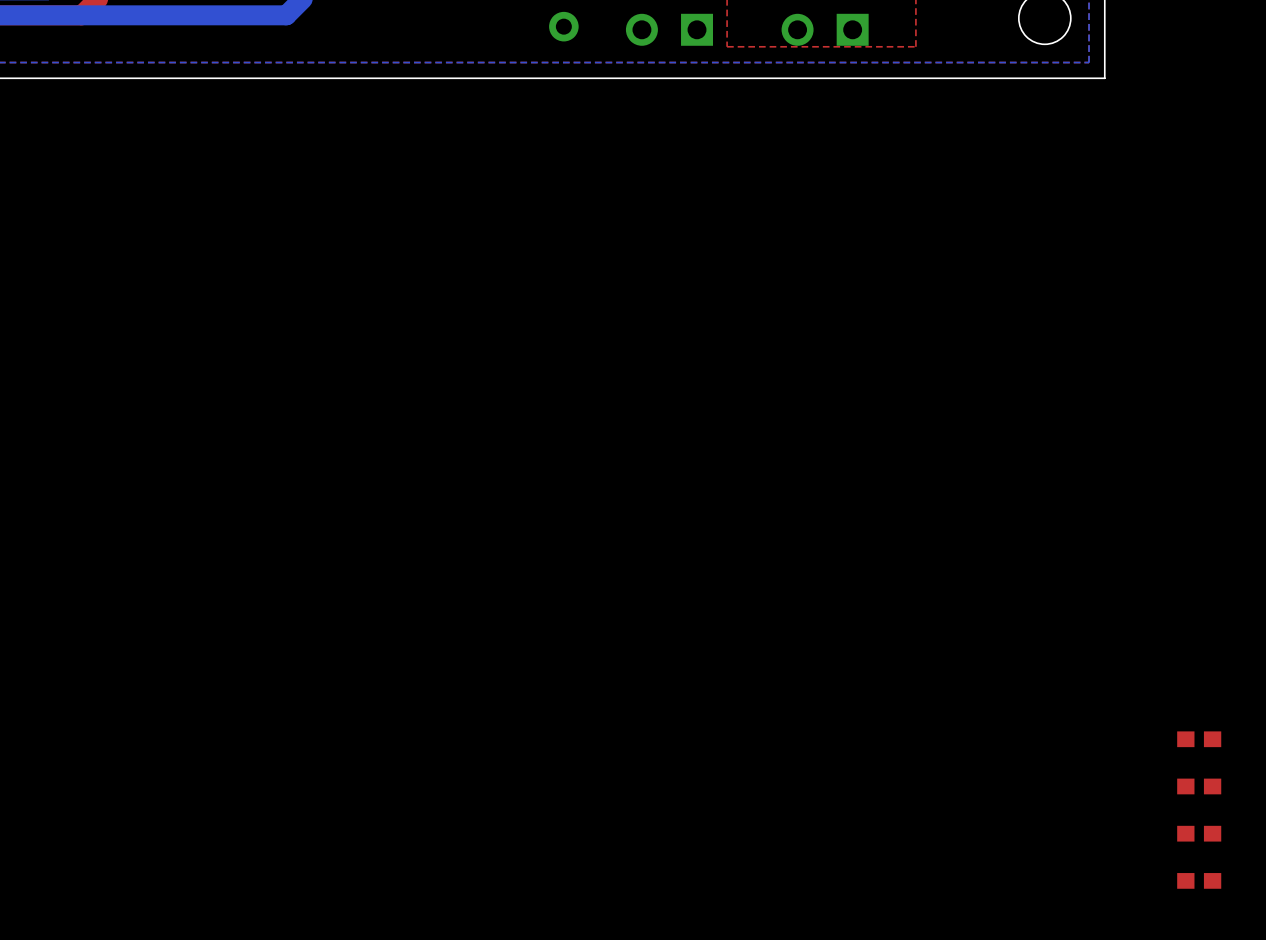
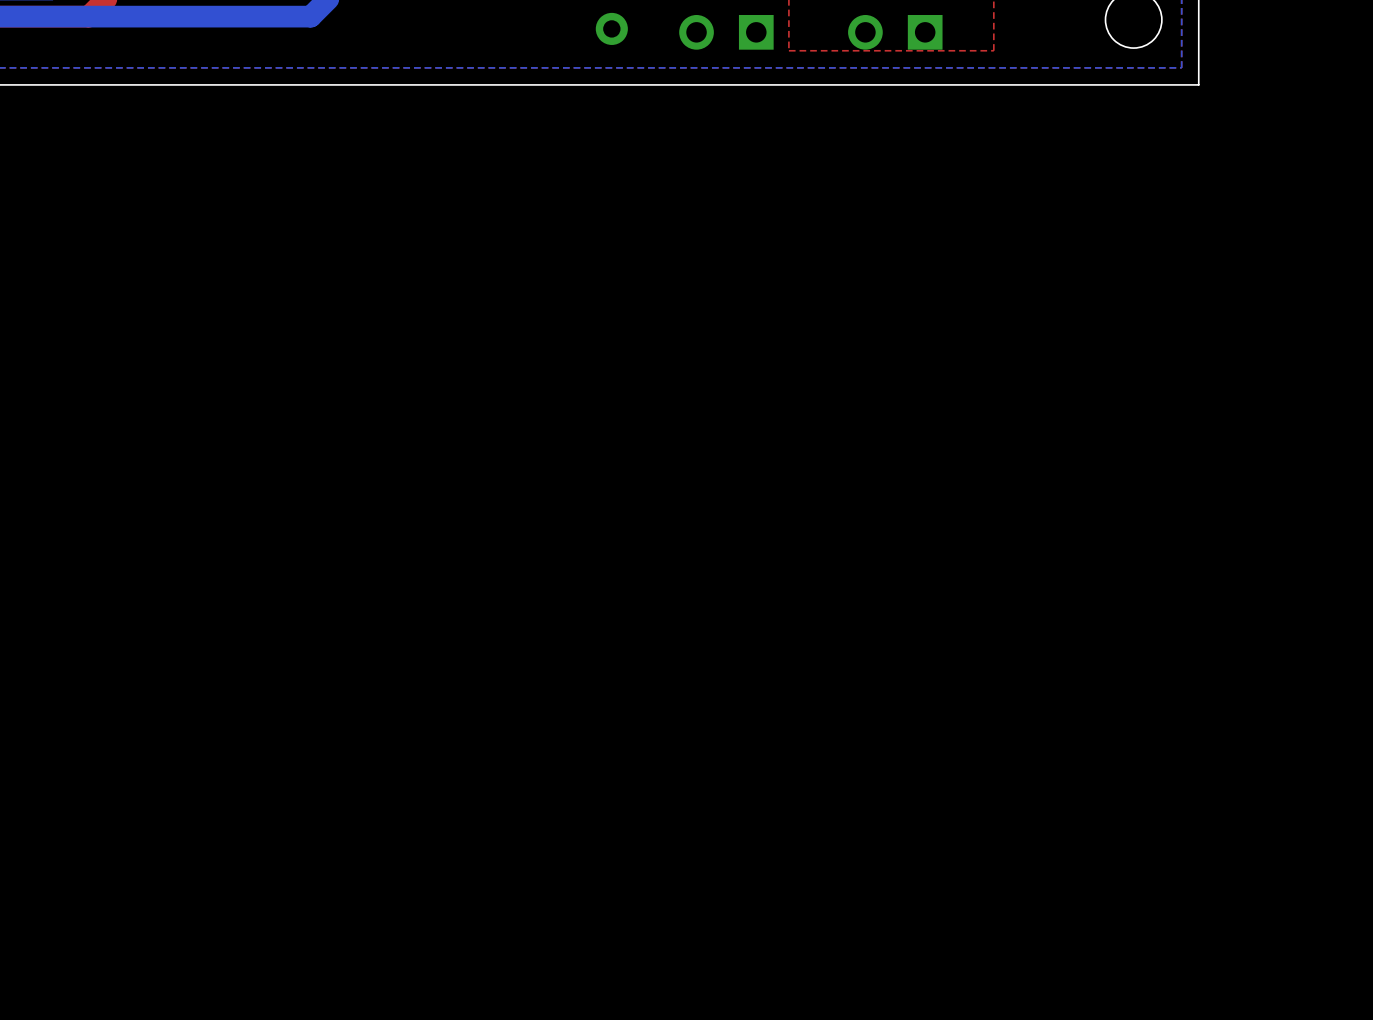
part: (1199, 739) -> none
part: (1199, 786) -> none
part: (1199, 833) -> none
part: (1199, 880) -> none

